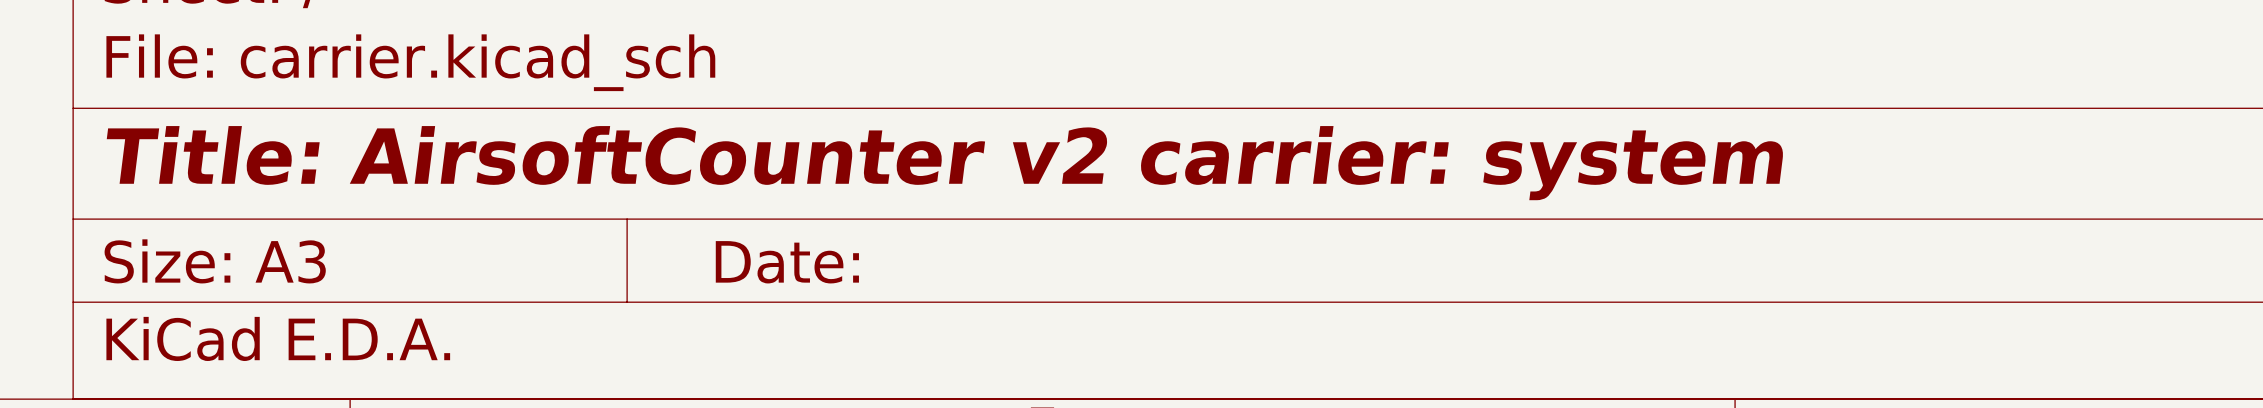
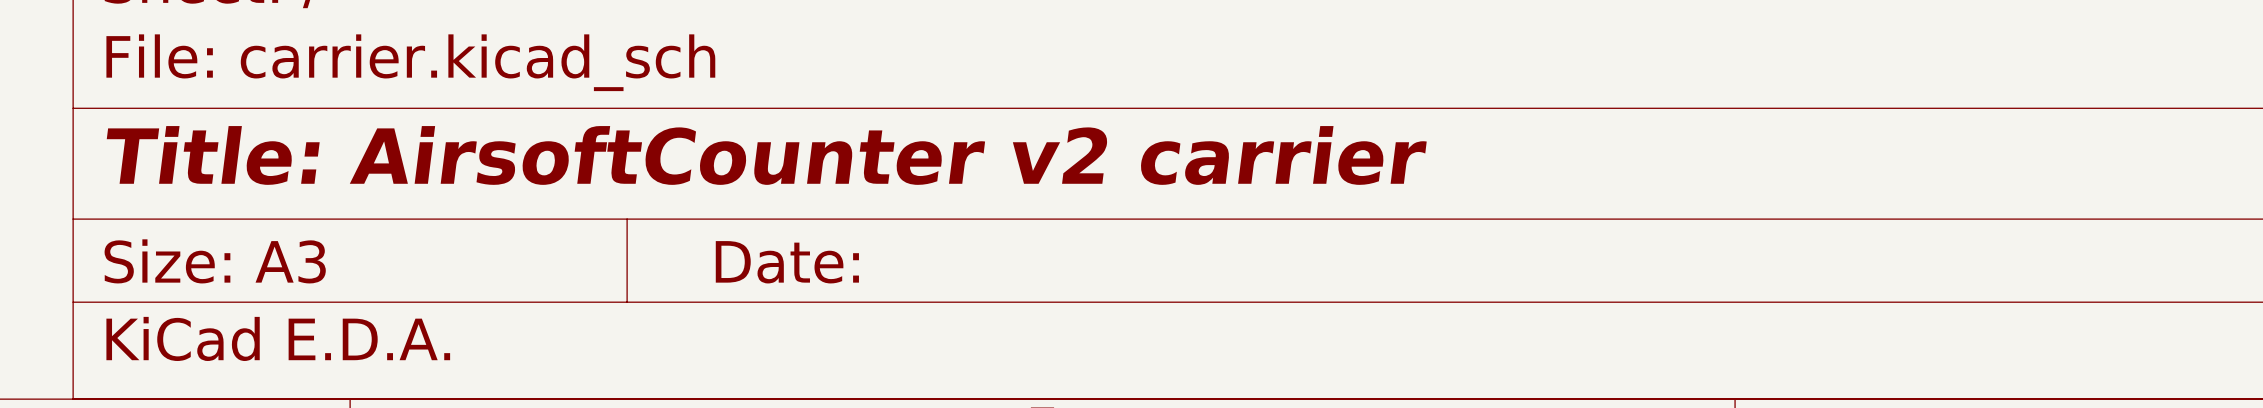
title block: Title: AirsoftCounter v2 carrier: system (945, 163) -> Title: AirsoftCounter v2 carrier (766, 155)

